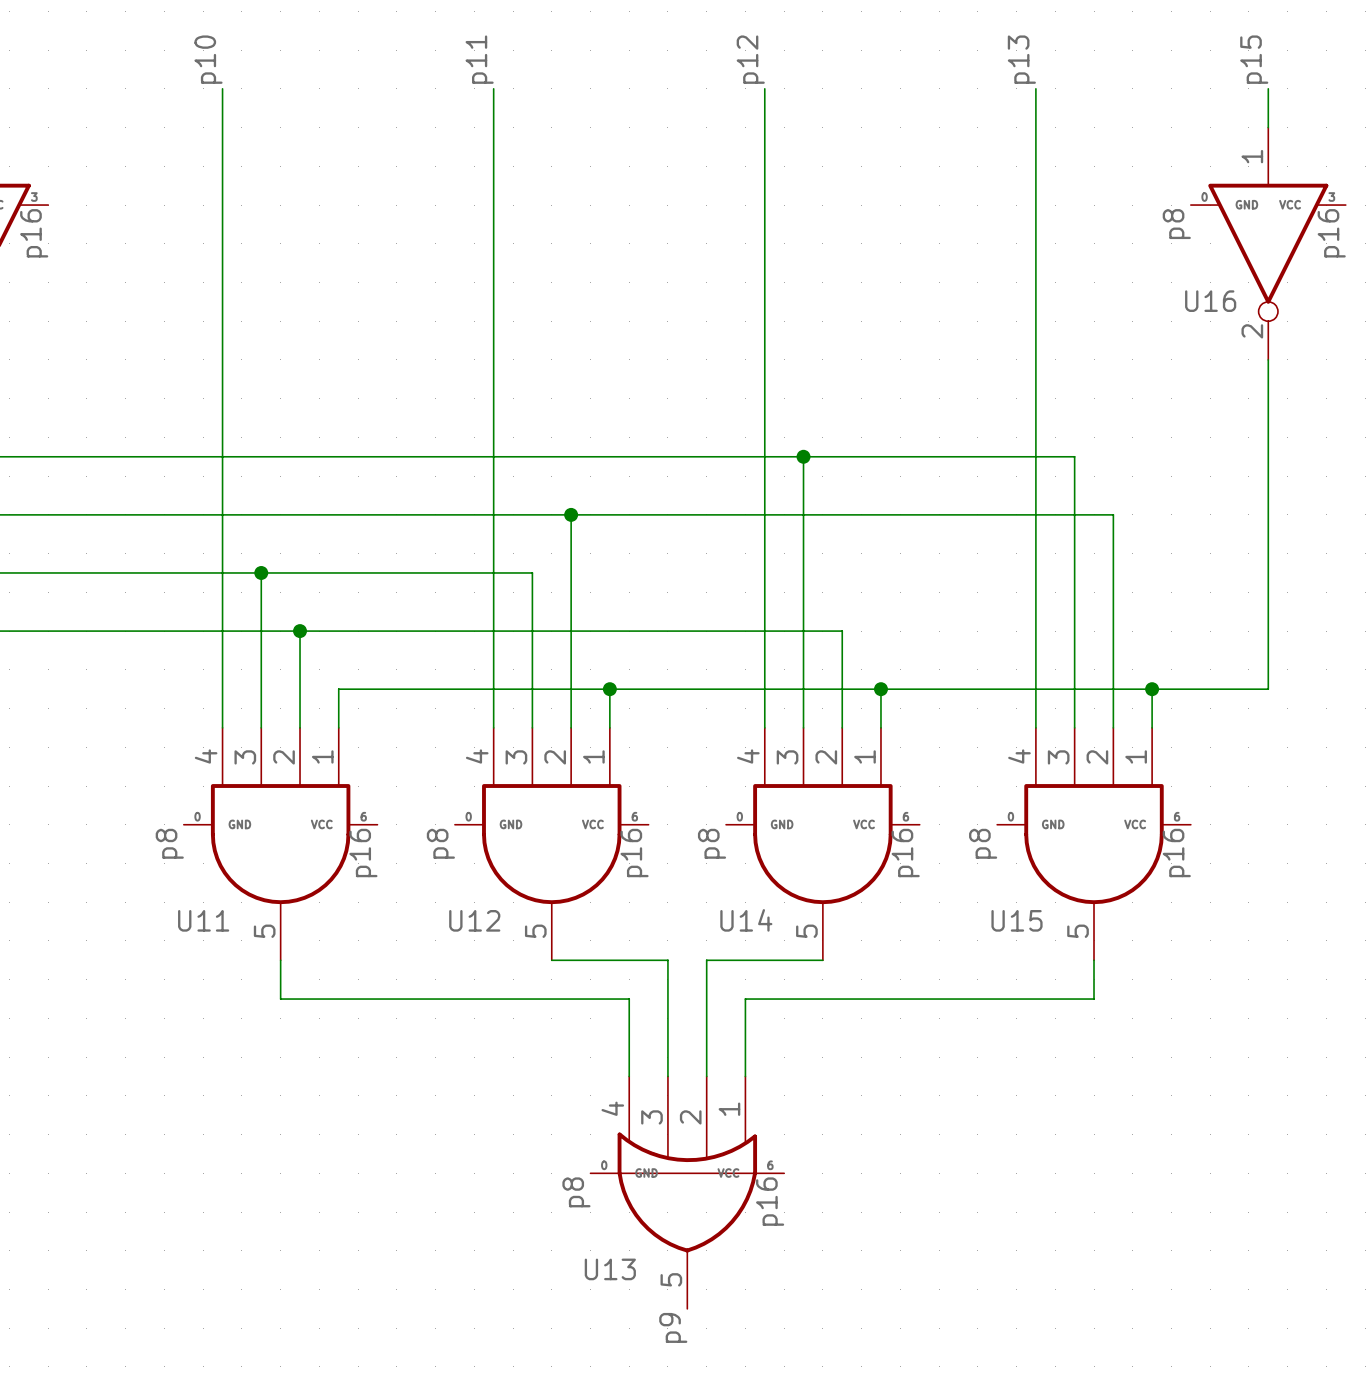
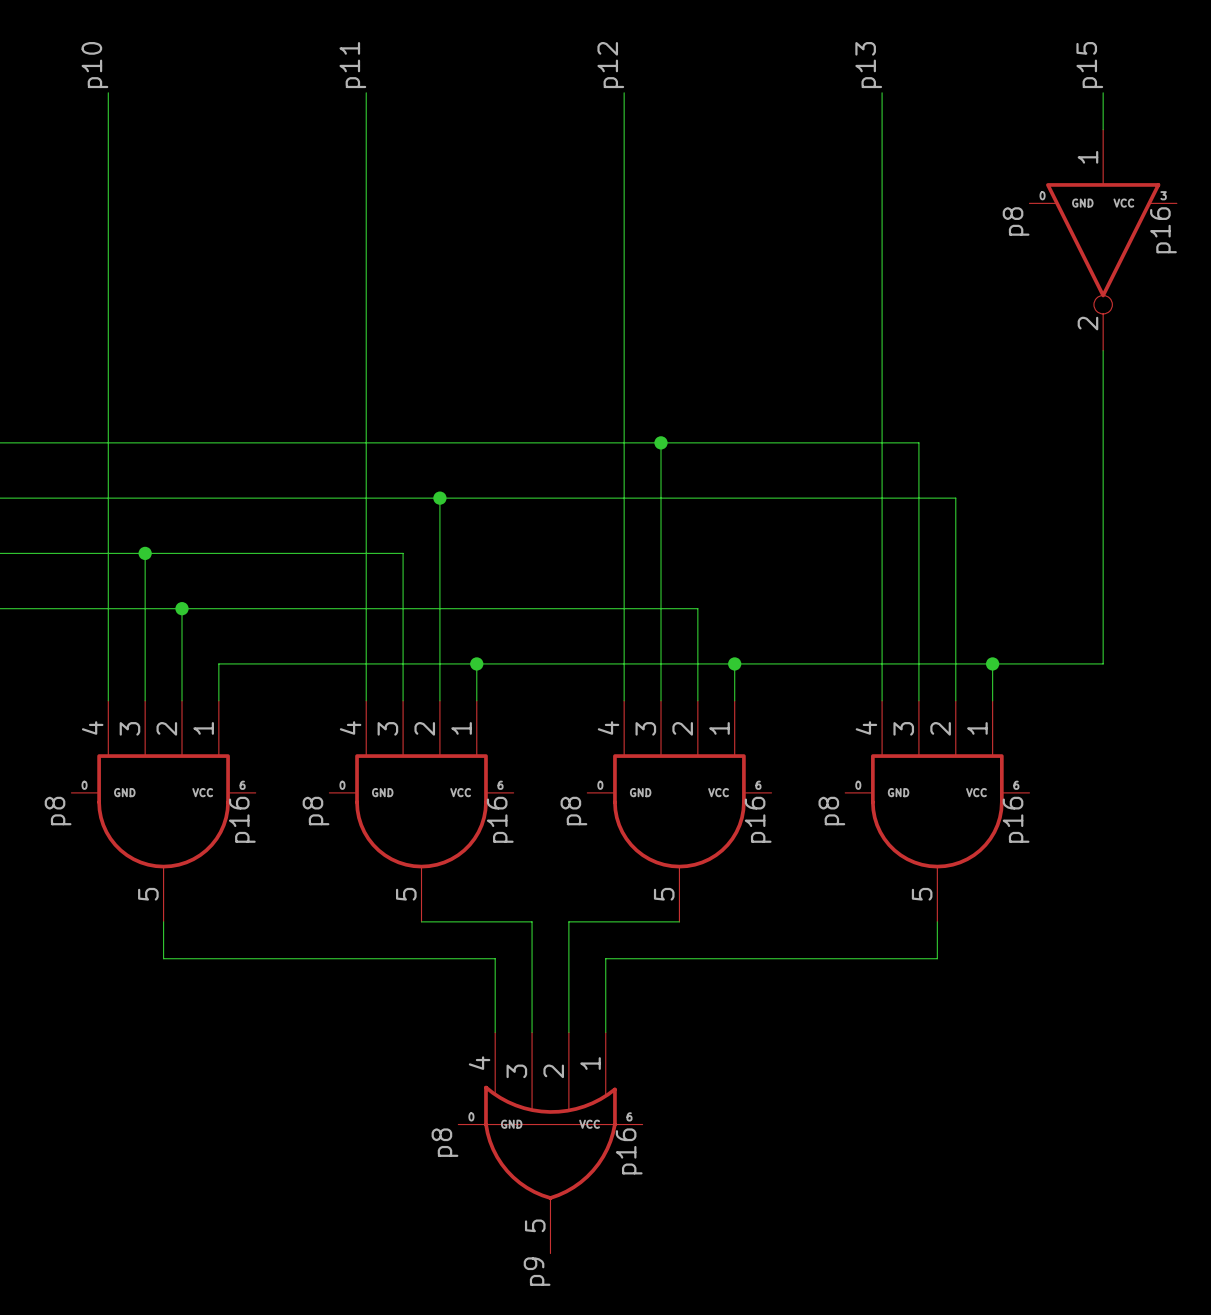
U16 name: U16 (1210, 301) -> none
U11 name: U11 (203, 920) -> none
U12 name: U12 (474, 920) -> none
U14 name: U14 (746, 920) -> none
U15 name: U15 (1017, 920) -> none
U13 name: U13 (610, 1269) -> none

